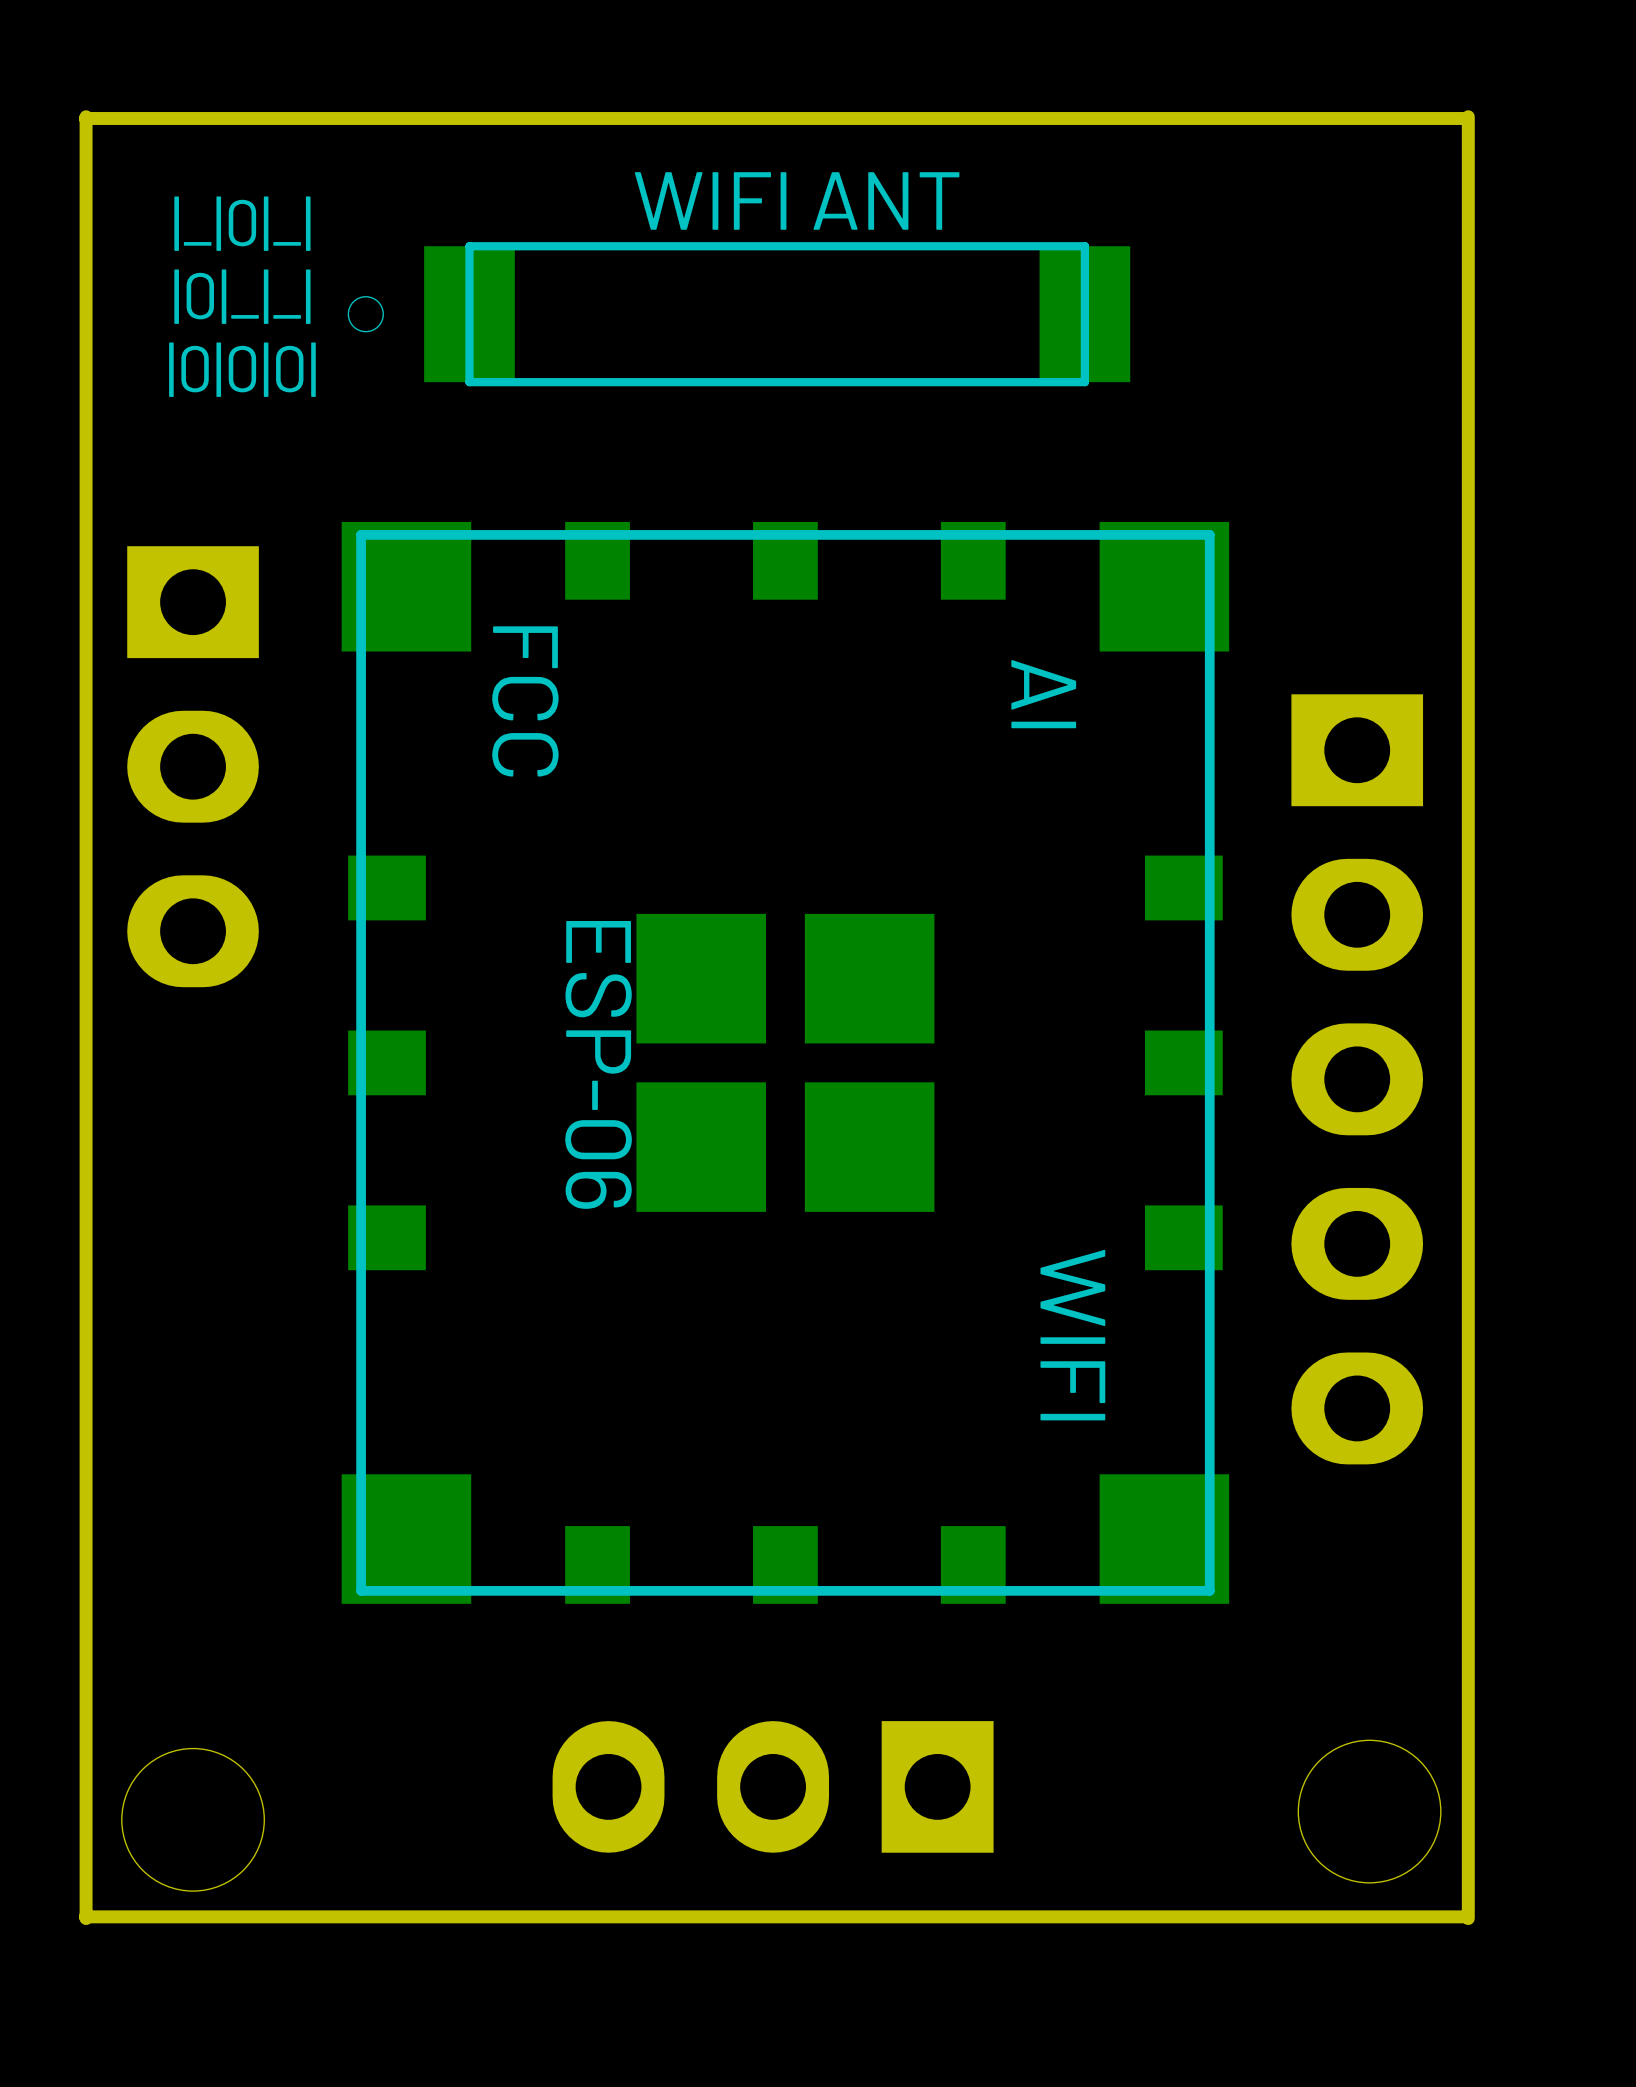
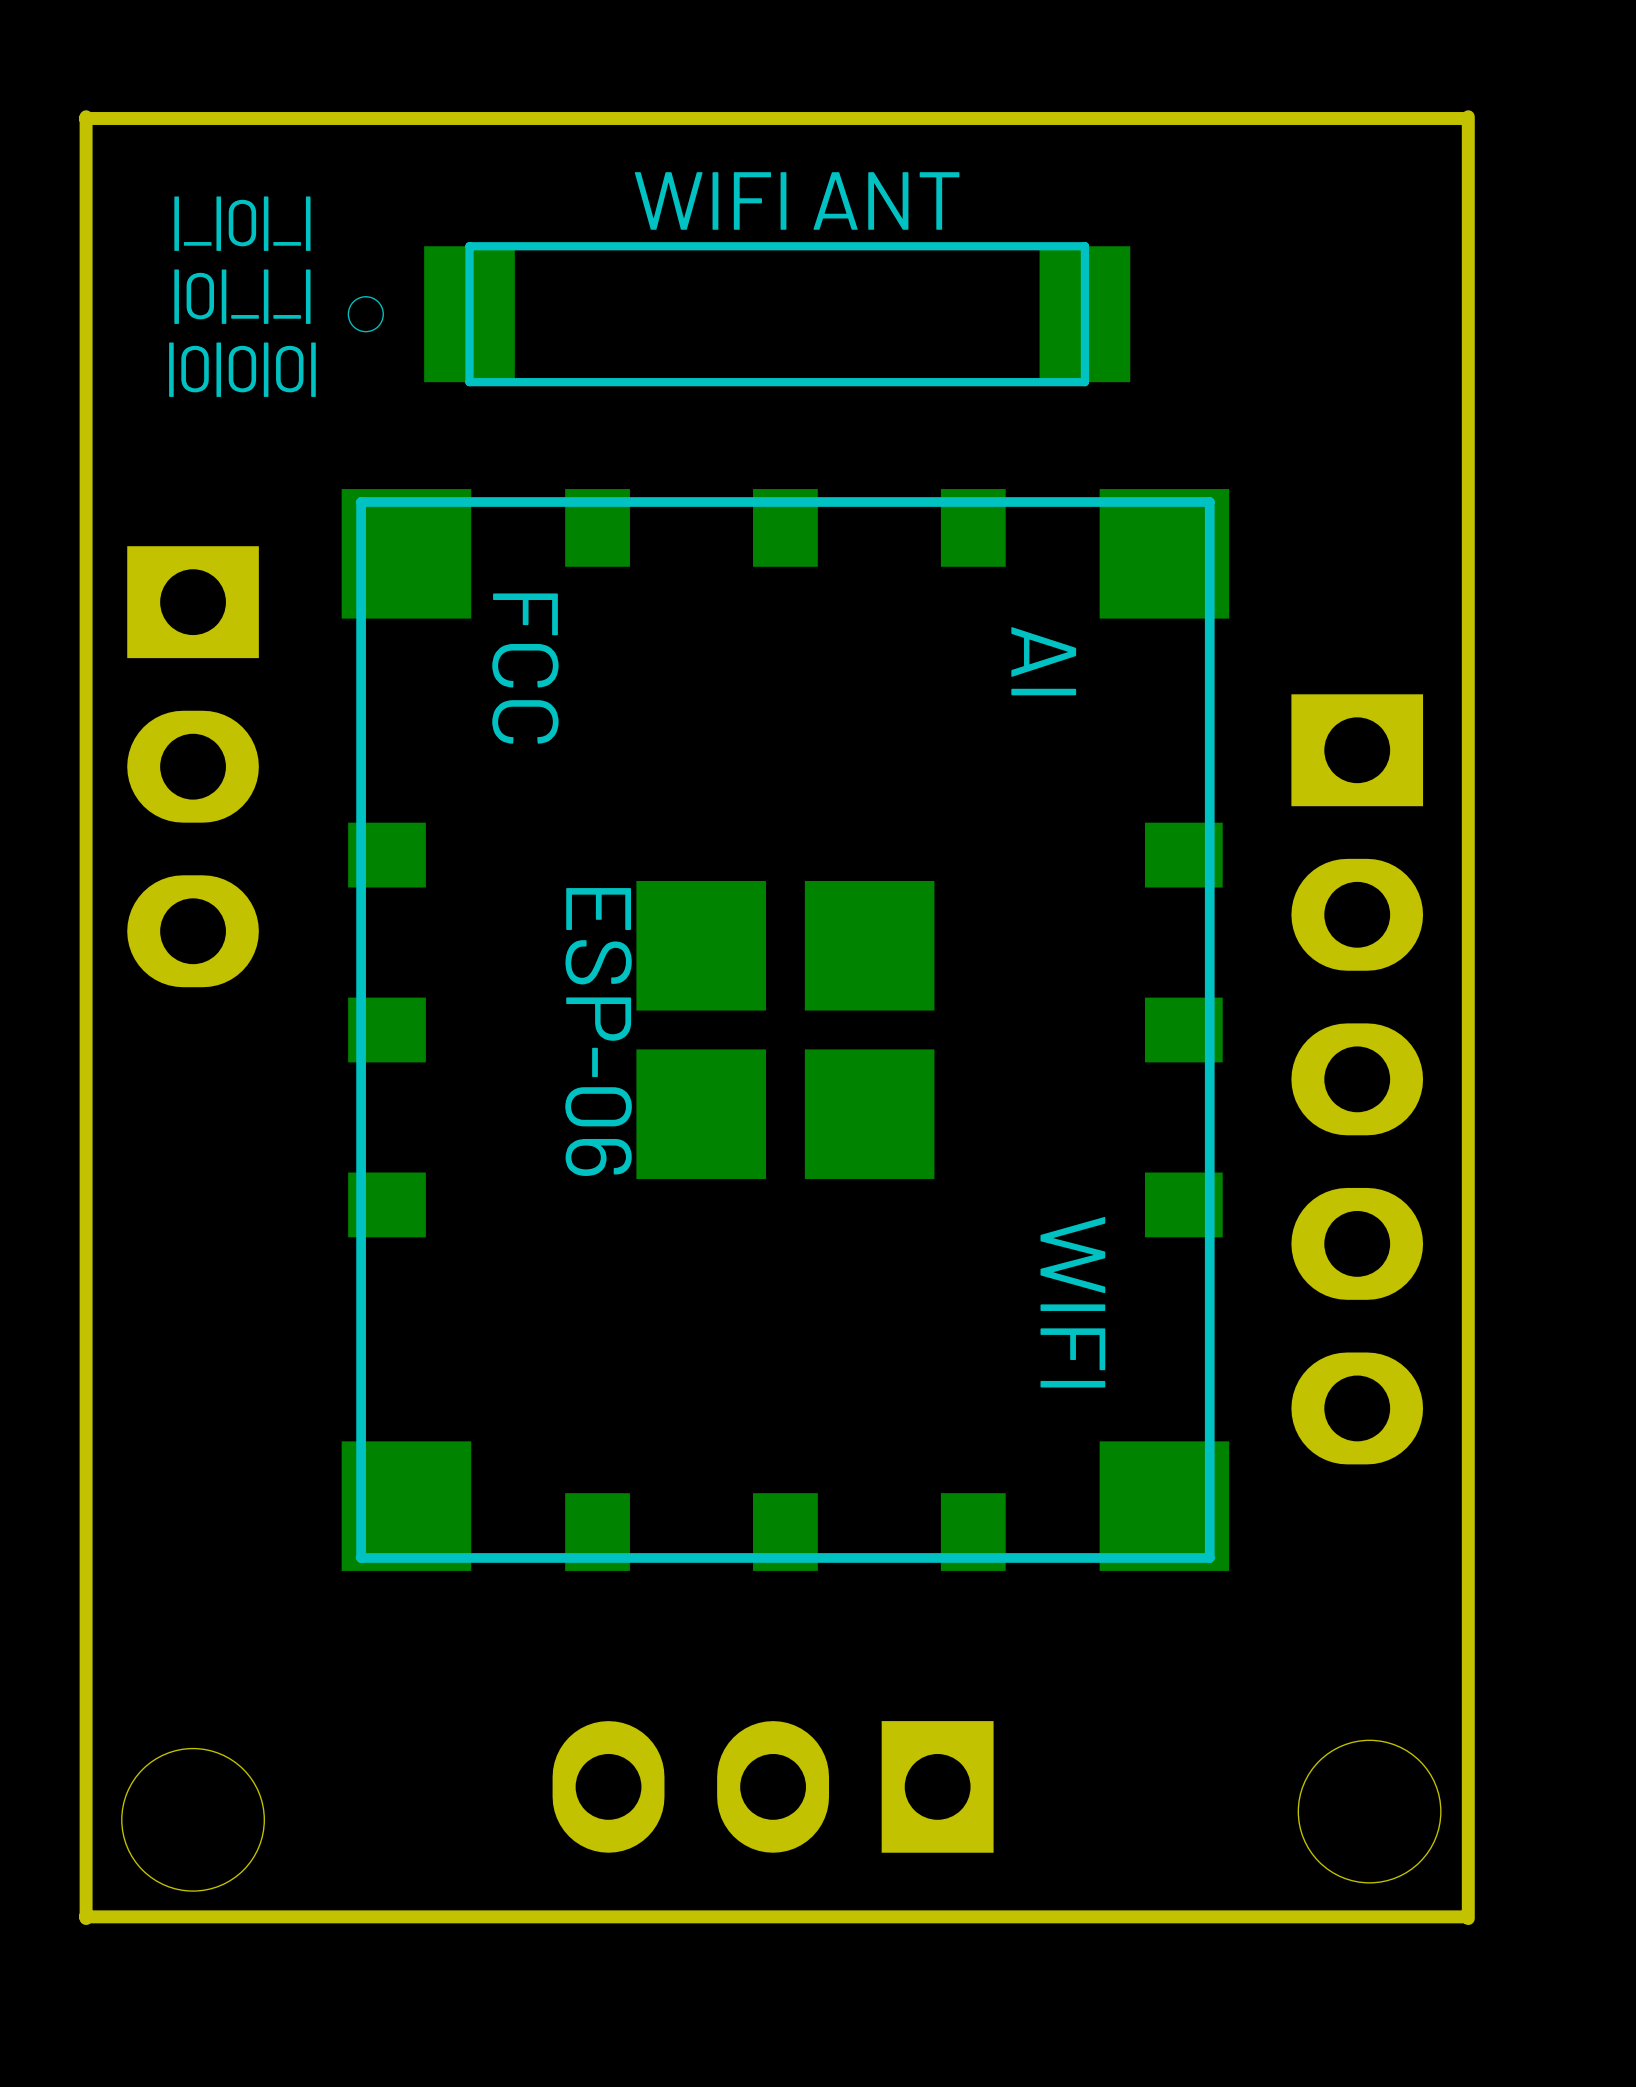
ESP-06 position: (785, 1062) -> (785, 1029)

